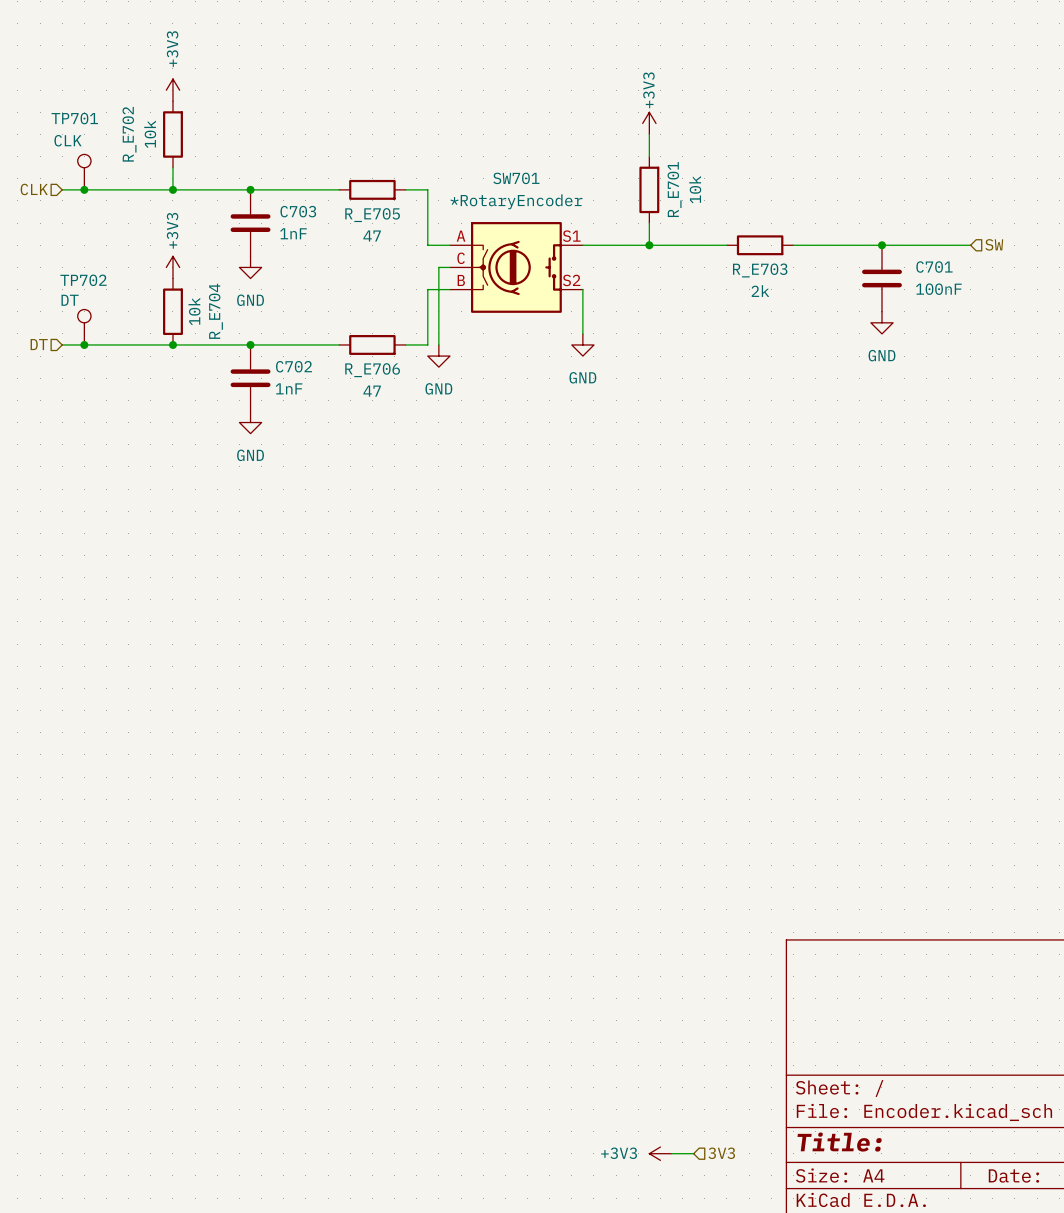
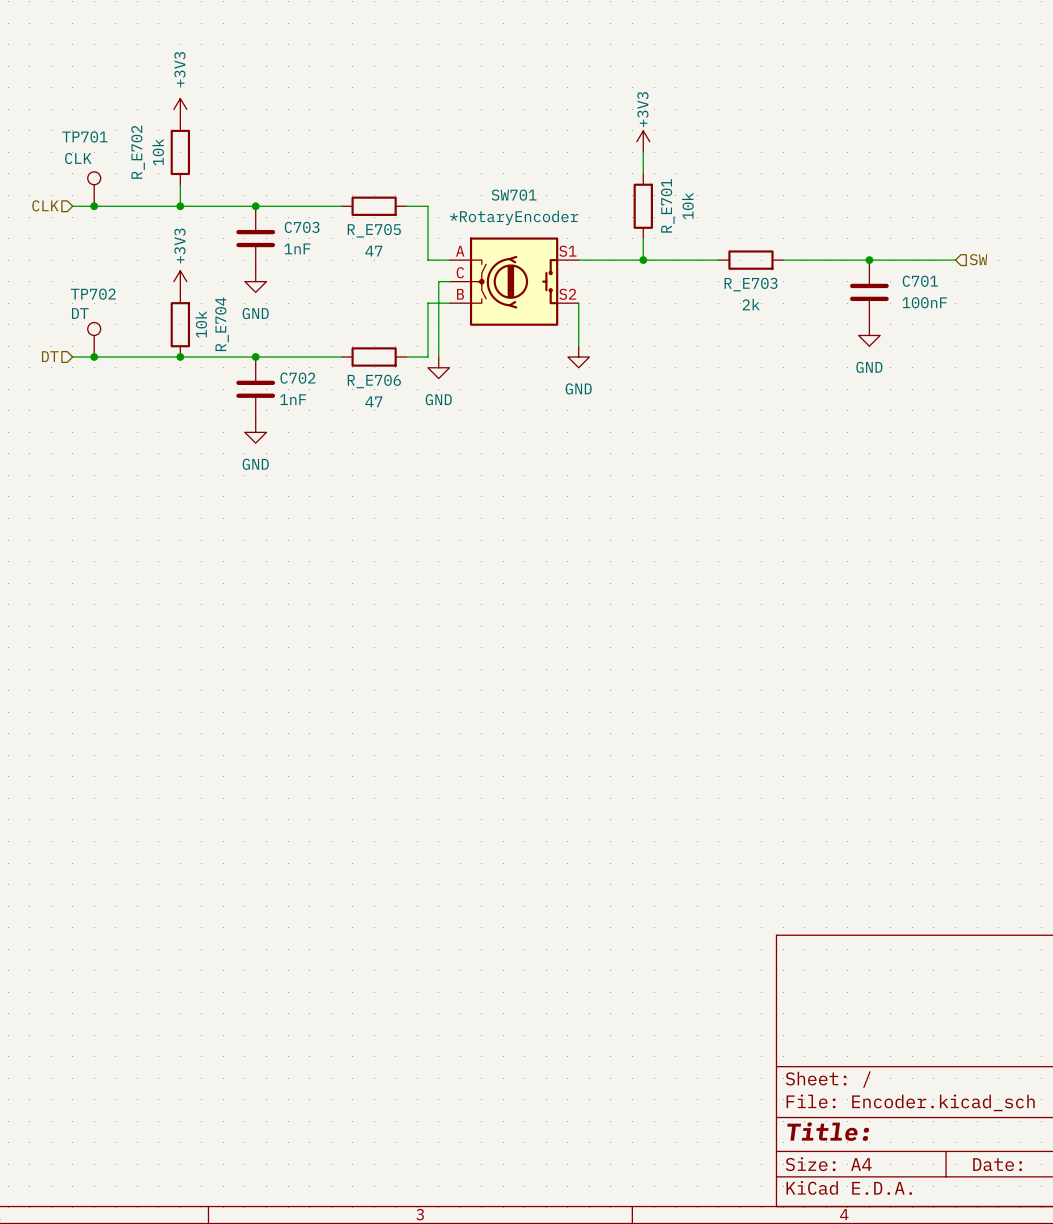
power symbol: +3V3 (660, 1153) -> none
wire: (671, 1153) (693, 1153) -> none
hierarchical label: 3V3 (721, 1153) -> none

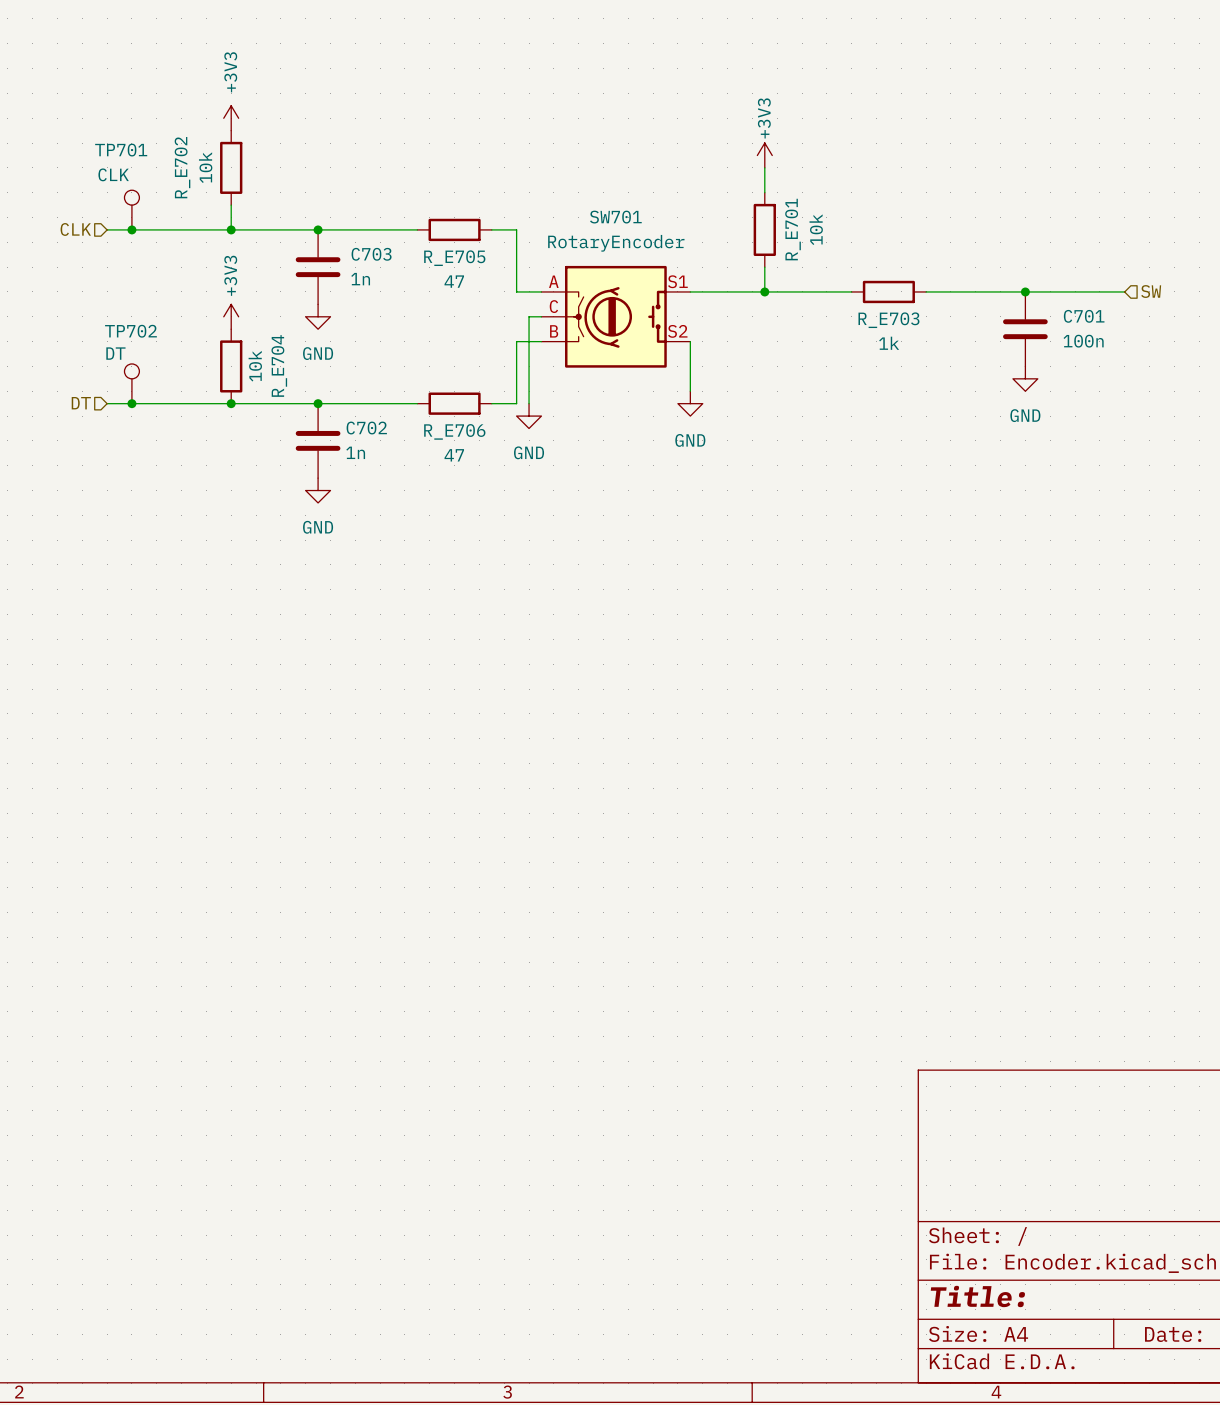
SW701 value: *RotaryEncoder (514, 217) -> RotaryEncoder (616, 243)
C703 value: 1nF (297, 248) -> 1n (360, 279)
C701 value: 100nF (924, 302) -> 100n (1083, 341)
R_E703 value: 2k (751, 304) -> 1k (889, 343)
C702 value: 1nF (293, 399) -> 1n (355, 452)

